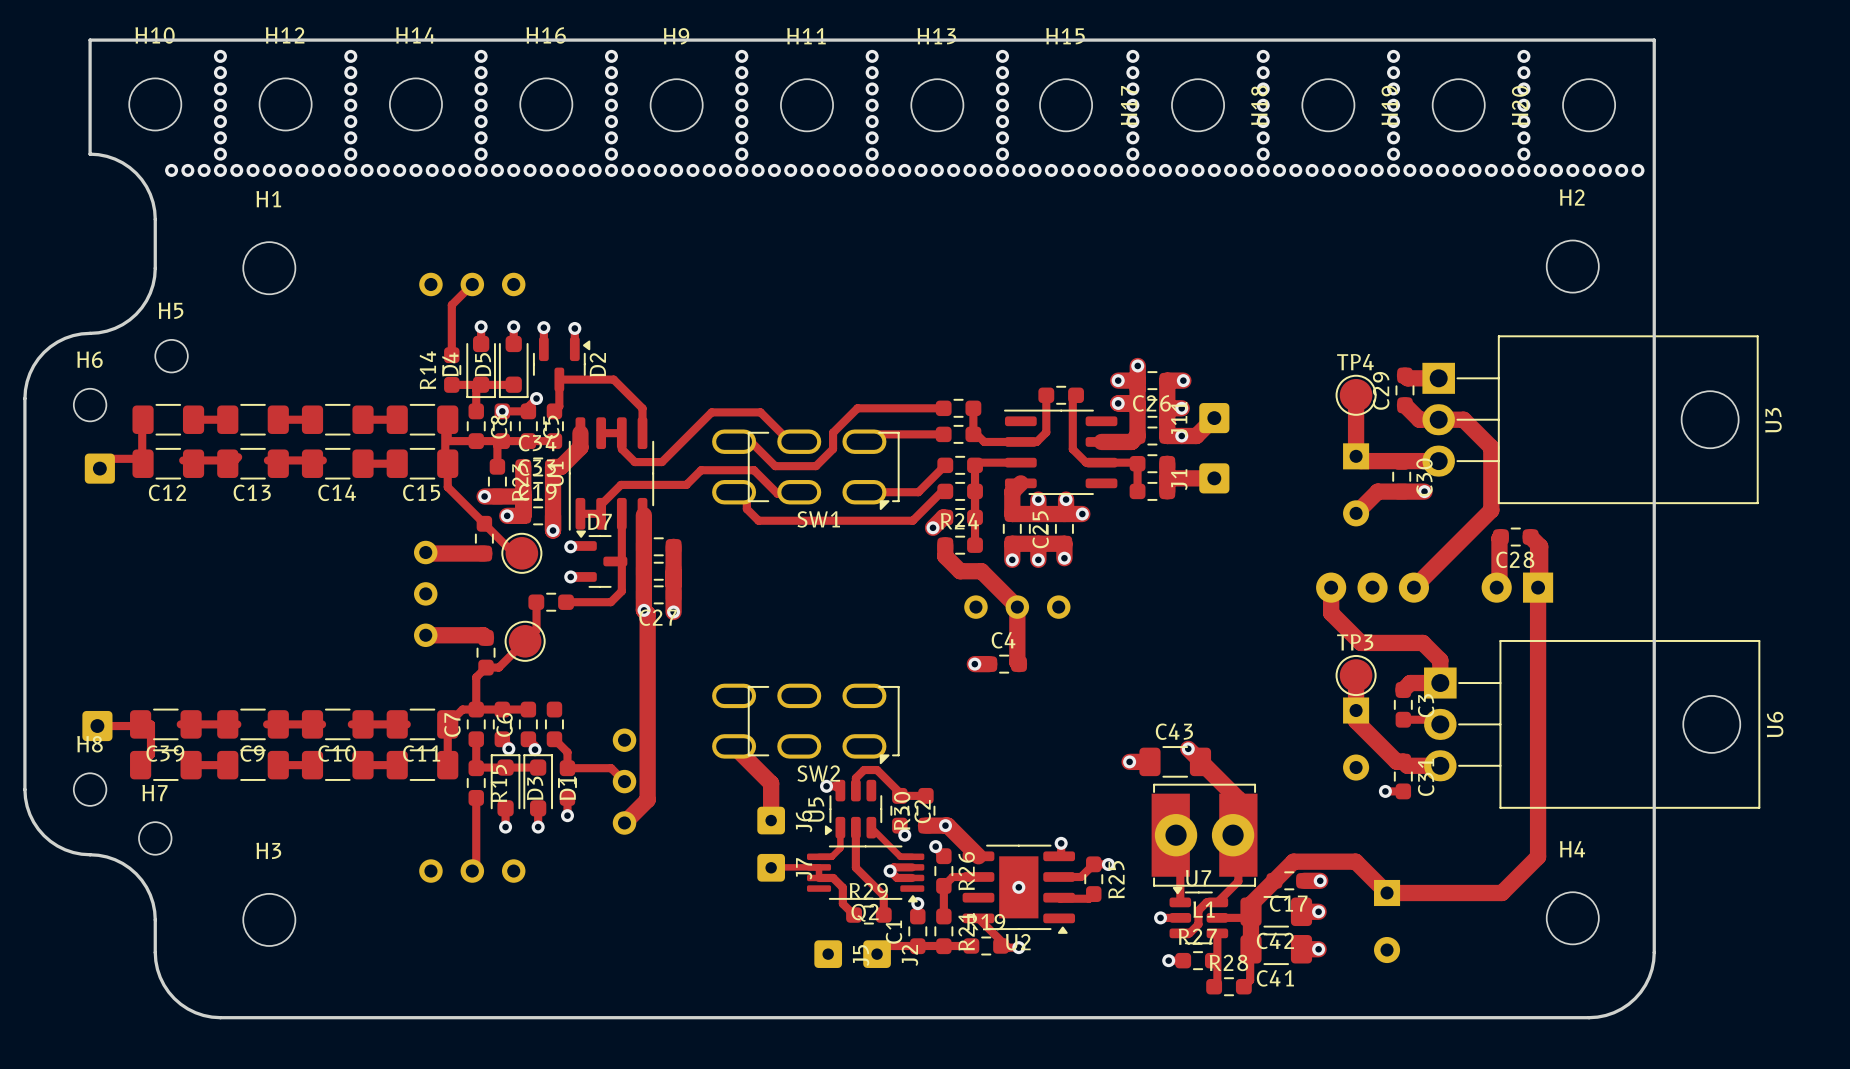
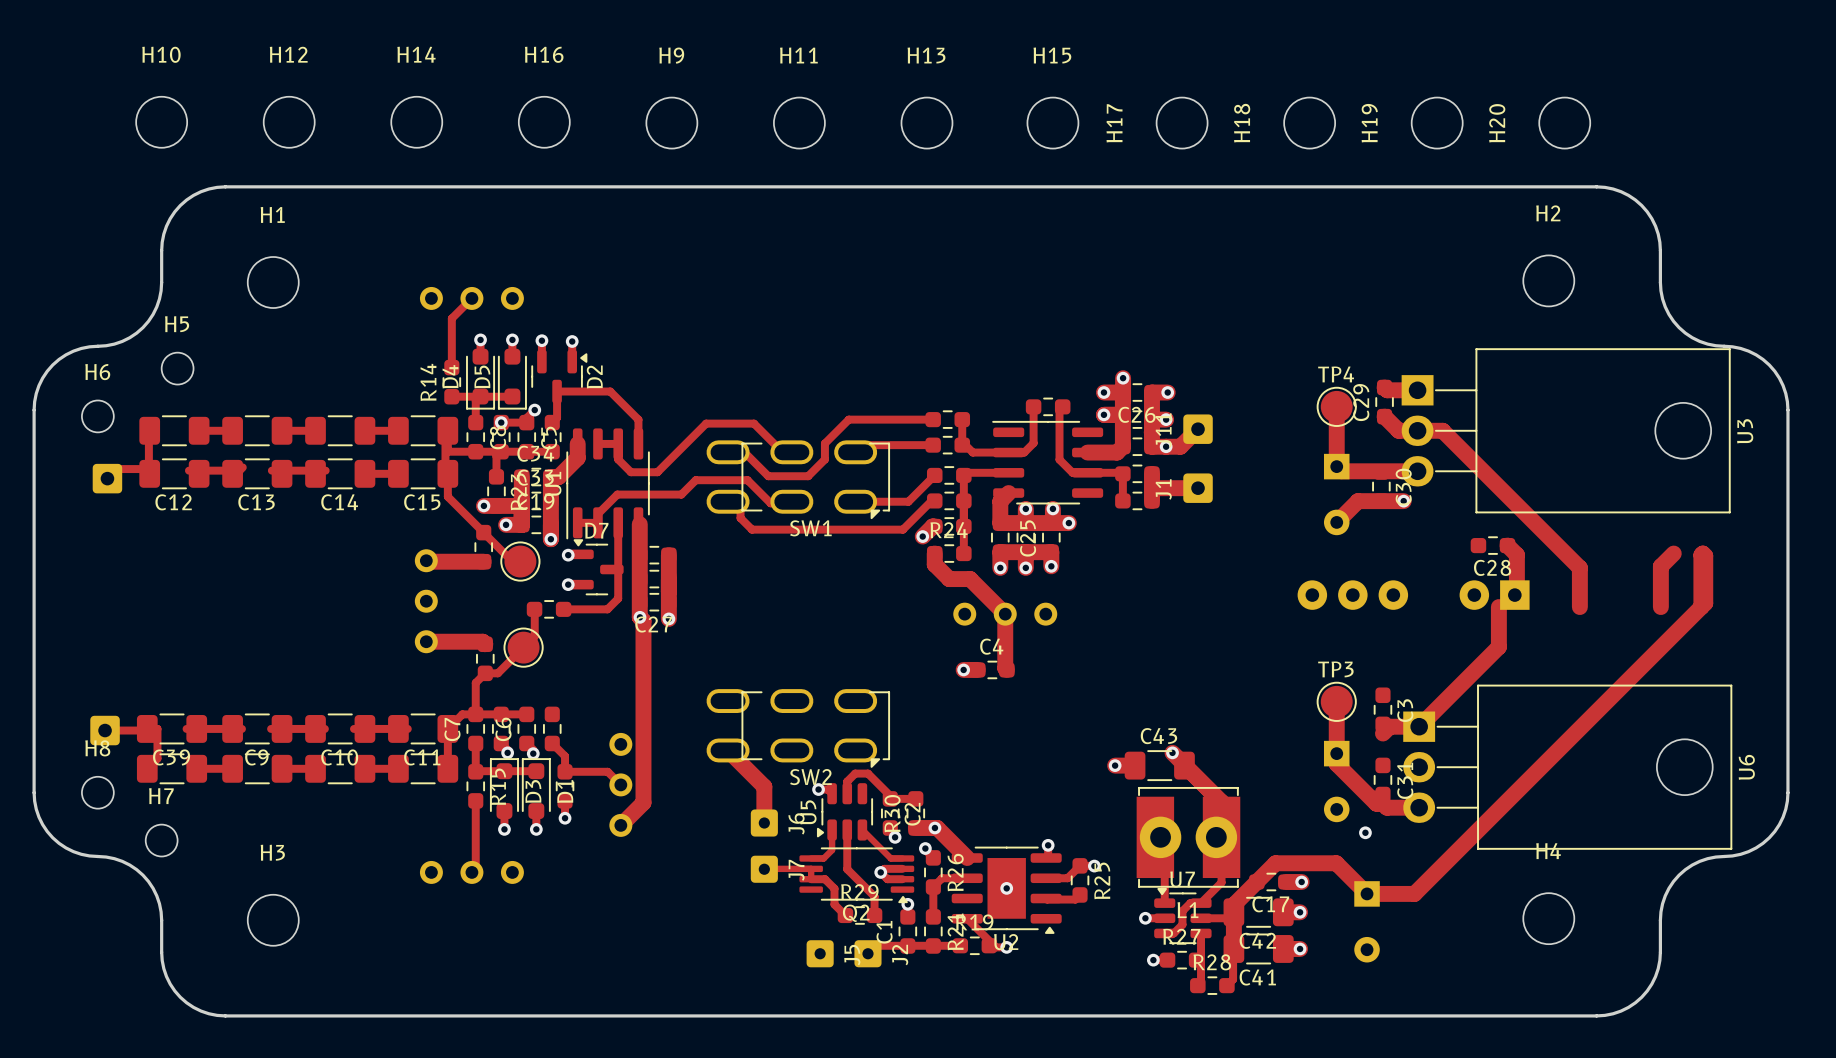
via: (220, 56) -> none
via: (350, 56) -> none
via: (481, 56) -> none
via: (611, 56) -> none
via: (741, 56) -> none
via: (872, 56) -> none
via: (1002, 56) -> none
via: (1132, 56) -> none
via: (1263, 56) -> none
via: (1393, 56) -> none
via: (1523, 56) -> none
via: (220, 72) -> none
via: (350, 72) -> none
via: (481, 72) -> none
via: (611, 72) -> none
via: (741, 72) -> none
via: (872, 72) -> none
via: (1002, 72) -> none
via: (1132, 72) -> none
via: (1263, 72) -> none
via: (1393, 72) -> none
via: (1523, 72) -> none
via: (220, 88) -> none
via: (350, 88) -> none
via: (481, 88) -> none
via: (611, 88) -> none
via: (741, 88) -> none
via: (872, 88) -> none
via: (1002, 88) -> none
via: (1132, 88) -> none
via: (1263, 88) -> none
via: (1393, 88) -> none
via: (1523, 88) -> none
via: (220, 105) -> none
via: (350, 105) -> none
via: (481, 105) -> none
via: (611, 105) -> none
via: (741, 105) -> none
via: (872, 105) -> none
via: (1002, 105) -> none
via: (1132, 105) -> none
via: (1263, 105) -> none
via: (1393, 105) -> none
via: (1523, 105) -> none
via: (220, 121) -> none
via: (350, 121) -> none
via: (481, 121) -> none
via: (611, 121) -> none
via: (741, 121) -> none
via: (872, 121) -> none
via: (1002, 121) -> none
via: (1132, 121) -> none
via: (1263, 121) -> none
via: (1393, 121) -> none
via: (1523, 121) -> none
via: (220, 137) -> none
via: (350, 137) -> none
via: (481, 137) -> none
via: (611, 137) -> none
via: (741, 137) -> none
via: (872, 137) -> none
via: (1002, 137) -> none
via: (1132, 137) -> none
via: (1263, 137) -> none
via: (1393, 137) -> none
via: (1523, 137) -> none
via: (220, 154) -> none
via: (350, 154) -> none
via: (481, 154) -> none
via: (611, 154) -> none
via: (741, 154) -> none
via: (872, 154) -> none
via: (1002, 154) -> none
via: (1132, 154) -> none
via: (1263, 154) -> none
via: (1393, 154) -> none
via: (1523, 154) -> none
via: (171, 170) -> none
via: (187, 170) -> none
via: (204, 170) -> none
via: (220, 170) -> none
via: (236, 170) -> none
via: (253, 170) -> none
via: (269, 170) -> none
via: (285, 170) -> none
via: (301, 170) -> none
via: (318, 170) -> none
via: (334, 170) -> none
via: (350, 170) -> none
via: (367, 170) -> none
via: (383, 170) -> none
via: (399, 170) -> none
via: (415, 170) -> none
via: (432, 170) -> none
via: (448, 170) -> none
via: (464, 170) -> none
via: (481, 170) -> none
via: (497, 170) -> none
via: (513, 170) -> none
via: (530, 170) -> none
via: (546, 170) -> none
via: (562, 170) -> none
via: (578, 170) -> none
via: (595, 170) -> none
via: (611, 170) -> none
via: (627, 170) -> none
via: (644, 170) -> none
via: (660, 170) -> none
via: (676, 170) -> none
via: (692, 170) -> none
via: (709, 170) -> none
via: (725, 170) -> none
via: (741, 170) -> none
via: (758, 170) -> none
via: (774, 170) -> none
via: (790, 170) -> none
via: (807, 170) -> none
via: (823, 170) -> none
via: (839, 170) -> none
via: (855, 170) -> none
via: (872, 170) -> none
via: (888, 170) -> none
via: (904, 170) -> none
via: (921, 170) -> none
via: (937, 170) -> none
via: (953, 170) -> none
via: (969, 170) -> none
via: (986, 170) -> none
via: (1002, 170) -> none
via: (1018, 170) -> none
via: (1035, 170) -> none
via: (1051, 170) -> none
via: (1067, 170) -> none
via: (1083, 170) -> none
via: (1100, 170) -> none
via: (1116, 170) -> none
via: (1132, 170) -> none
via: (1149, 170) -> none
via: (1165, 170) -> none
via: (1181, 170) -> none
via: (1198, 170) -> none
via: (1214, 170) -> none
via: (1230, 170) -> none
via: (1246, 170) -> none
via: (1263, 170) -> none
via: (1279, 170) -> none
via: (1295, 170) -> none
via: (1312, 170) -> none
via: (1328, 170) -> none
via: (1344, 170) -> none
via: (1360, 170) -> none
via: (1377, 170) -> none
via: (1393, 170) -> none
via: (1409, 170) -> none
via: (1426, 170) -> none
via: (1442, 170) -> none
via: (1458, 170) -> none
via: (1475, 170) -> none
via: (1491, 170) -> none
via: (1507, 170) -> none
via: (1523, 170) -> none
via: (1540, 170) -> none
via: (1556, 170) -> none
via: (1572, 170) -> none
via: (1589, 170) -> none
via: (1605, 170) -> none
via: (1621, 170) -> none
via: (1637, 170) -> none
board edge: (155, 235) (153, 202) (141, 179) (122, 162) (106, 156) (90, 154) (90, 40) (1654, 40) (1653, 961) (1645, 985) (1628, 1004) (1605, 1015) (1589, 1017) -> (161, 250) (166, 226) (180, 205) (201, 191) (225, 186) (1596, 186) (1613, 189) (1628, 195) (1641, 205) (1655, 226) (1659, 242) (1660, 290) (1665, 306) (1673, 321) (1685, 333) (1699, 341) (1715, 345) (1740, 348) (1756, 354) (1774, 371) (1785, 393) (1787, 410) (1787, 801) (1779, 824) (1763, 843) (1740, 854) (1715, 857) (1699, 861) (1685, 869) (1673, 881) (1665, 895) (1660, 911) (1658, 968) (1651, 984) (1641, 997) (1628, 1007) (1613, 1013) (1564, 1015)
track: (1463, 419) (1491, 447) (1491, 510) (1413, 587) -> (1441, 430) (1579, 567) (1579, 607)
track: (1500, 537) (1499, 584) (1496, 587) -> none
track: none -> (1673, 553) (1660, 566) (1660, 607)
track: (1538, 548) (1538, 856) (1501, 893) (1435, 893) -> (1701, 607) (1702, 553) (1705, 555) (1705, 603) (1414, 893)
track: (1331, 587) (1331, 613) (1360, 642) (1422, 642) (1440, 660) (1440, 683) (1410, 683) (1403, 689) -> none
track: none -> (1498, 607) (1498, 646) (1419, 726) (1389, 726) (1382, 733)
TP3 position: (1356, 675) -> (1336, 701)
track: (1356, 721) (1396, 761) (1403, 761) (1407, 765) (1440, 765) -> (1336, 725) (1336, 764) (1376, 803) (1382, 803) (1387, 807) (1419, 807)
U6 position: (1592, 724) -> (1567, 767)
part position: (1356, 739) -> (1336, 781)
via position: (1385, 791) -> (1365, 832)

